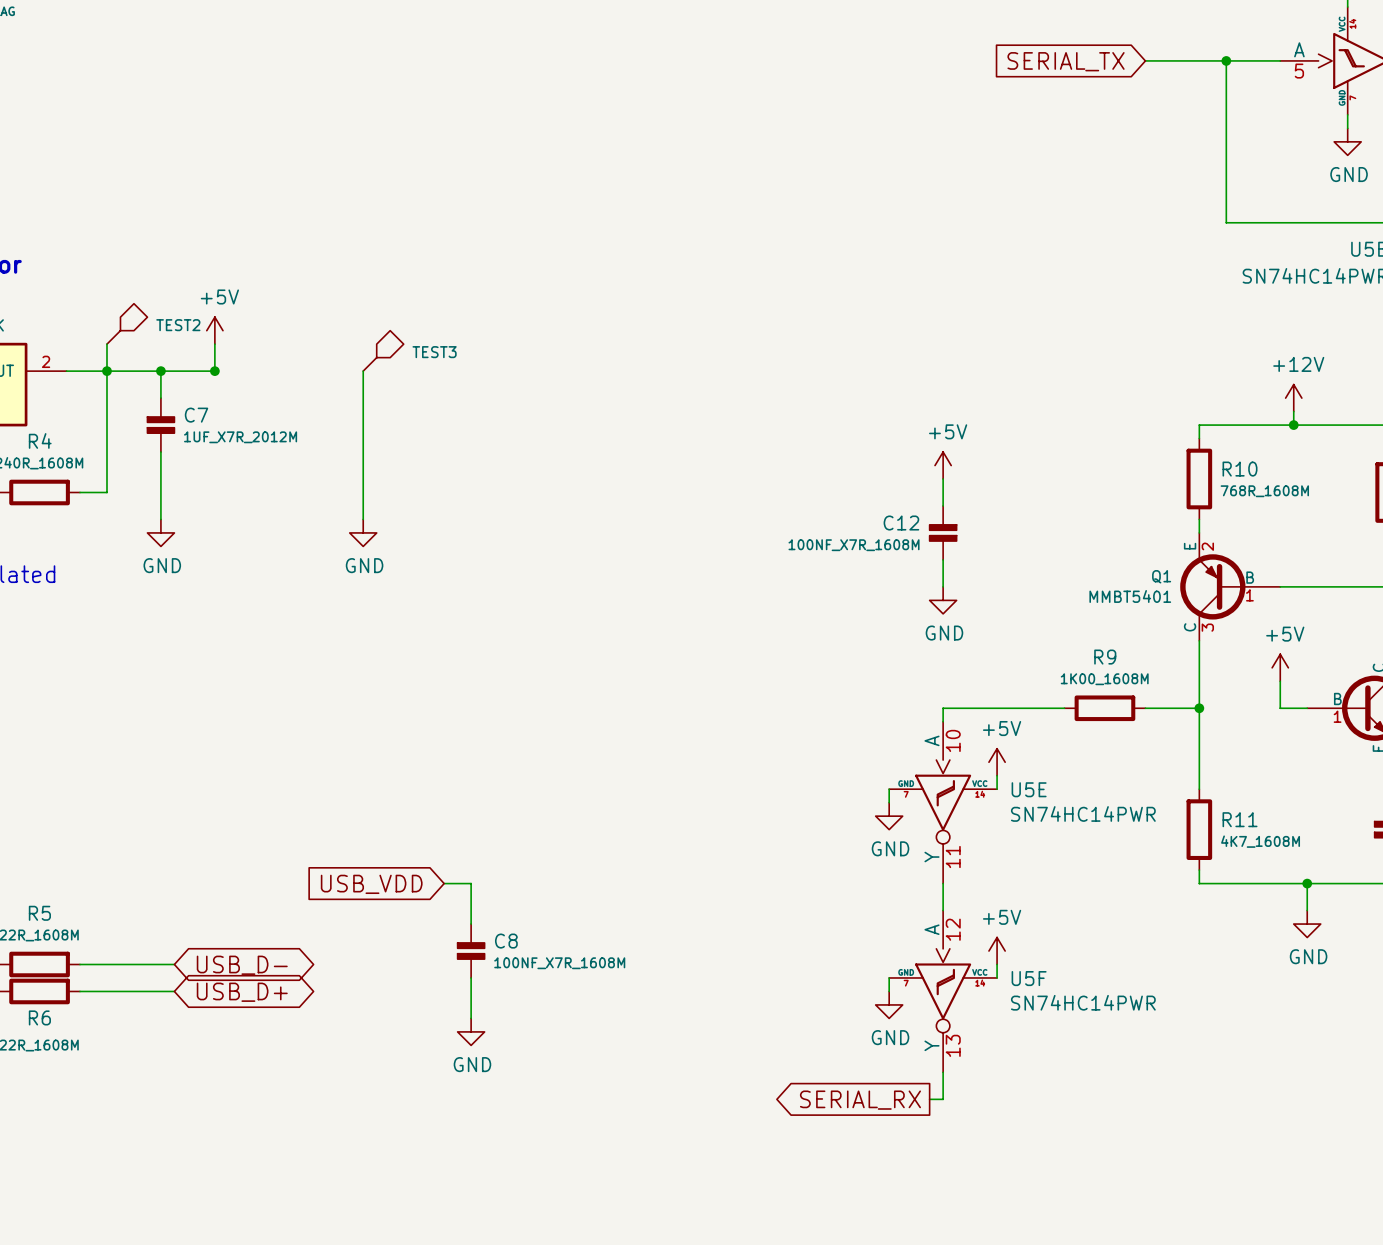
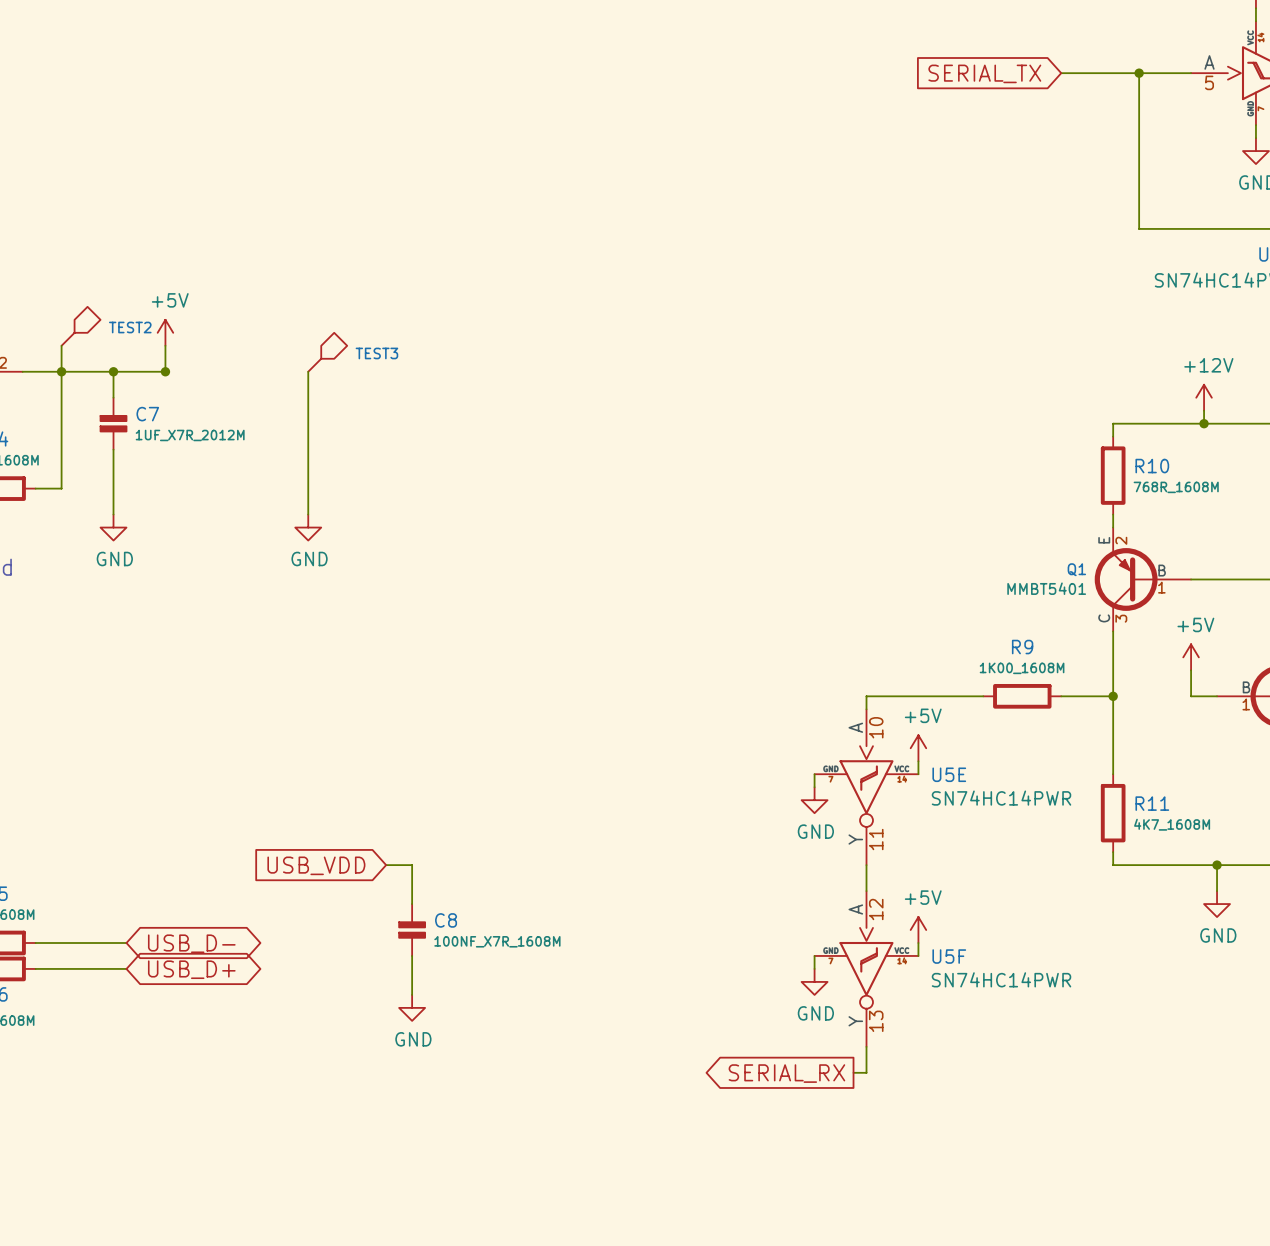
power symbol: +5V (943, 465) -> none
wire: (943, 479) (943, 505) -> none
C12: 100NF_X7R_1608M (943, 532) -> none
wire: (943, 559) (943, 586) -> none
power symbol: GND (943, 600) -> none

